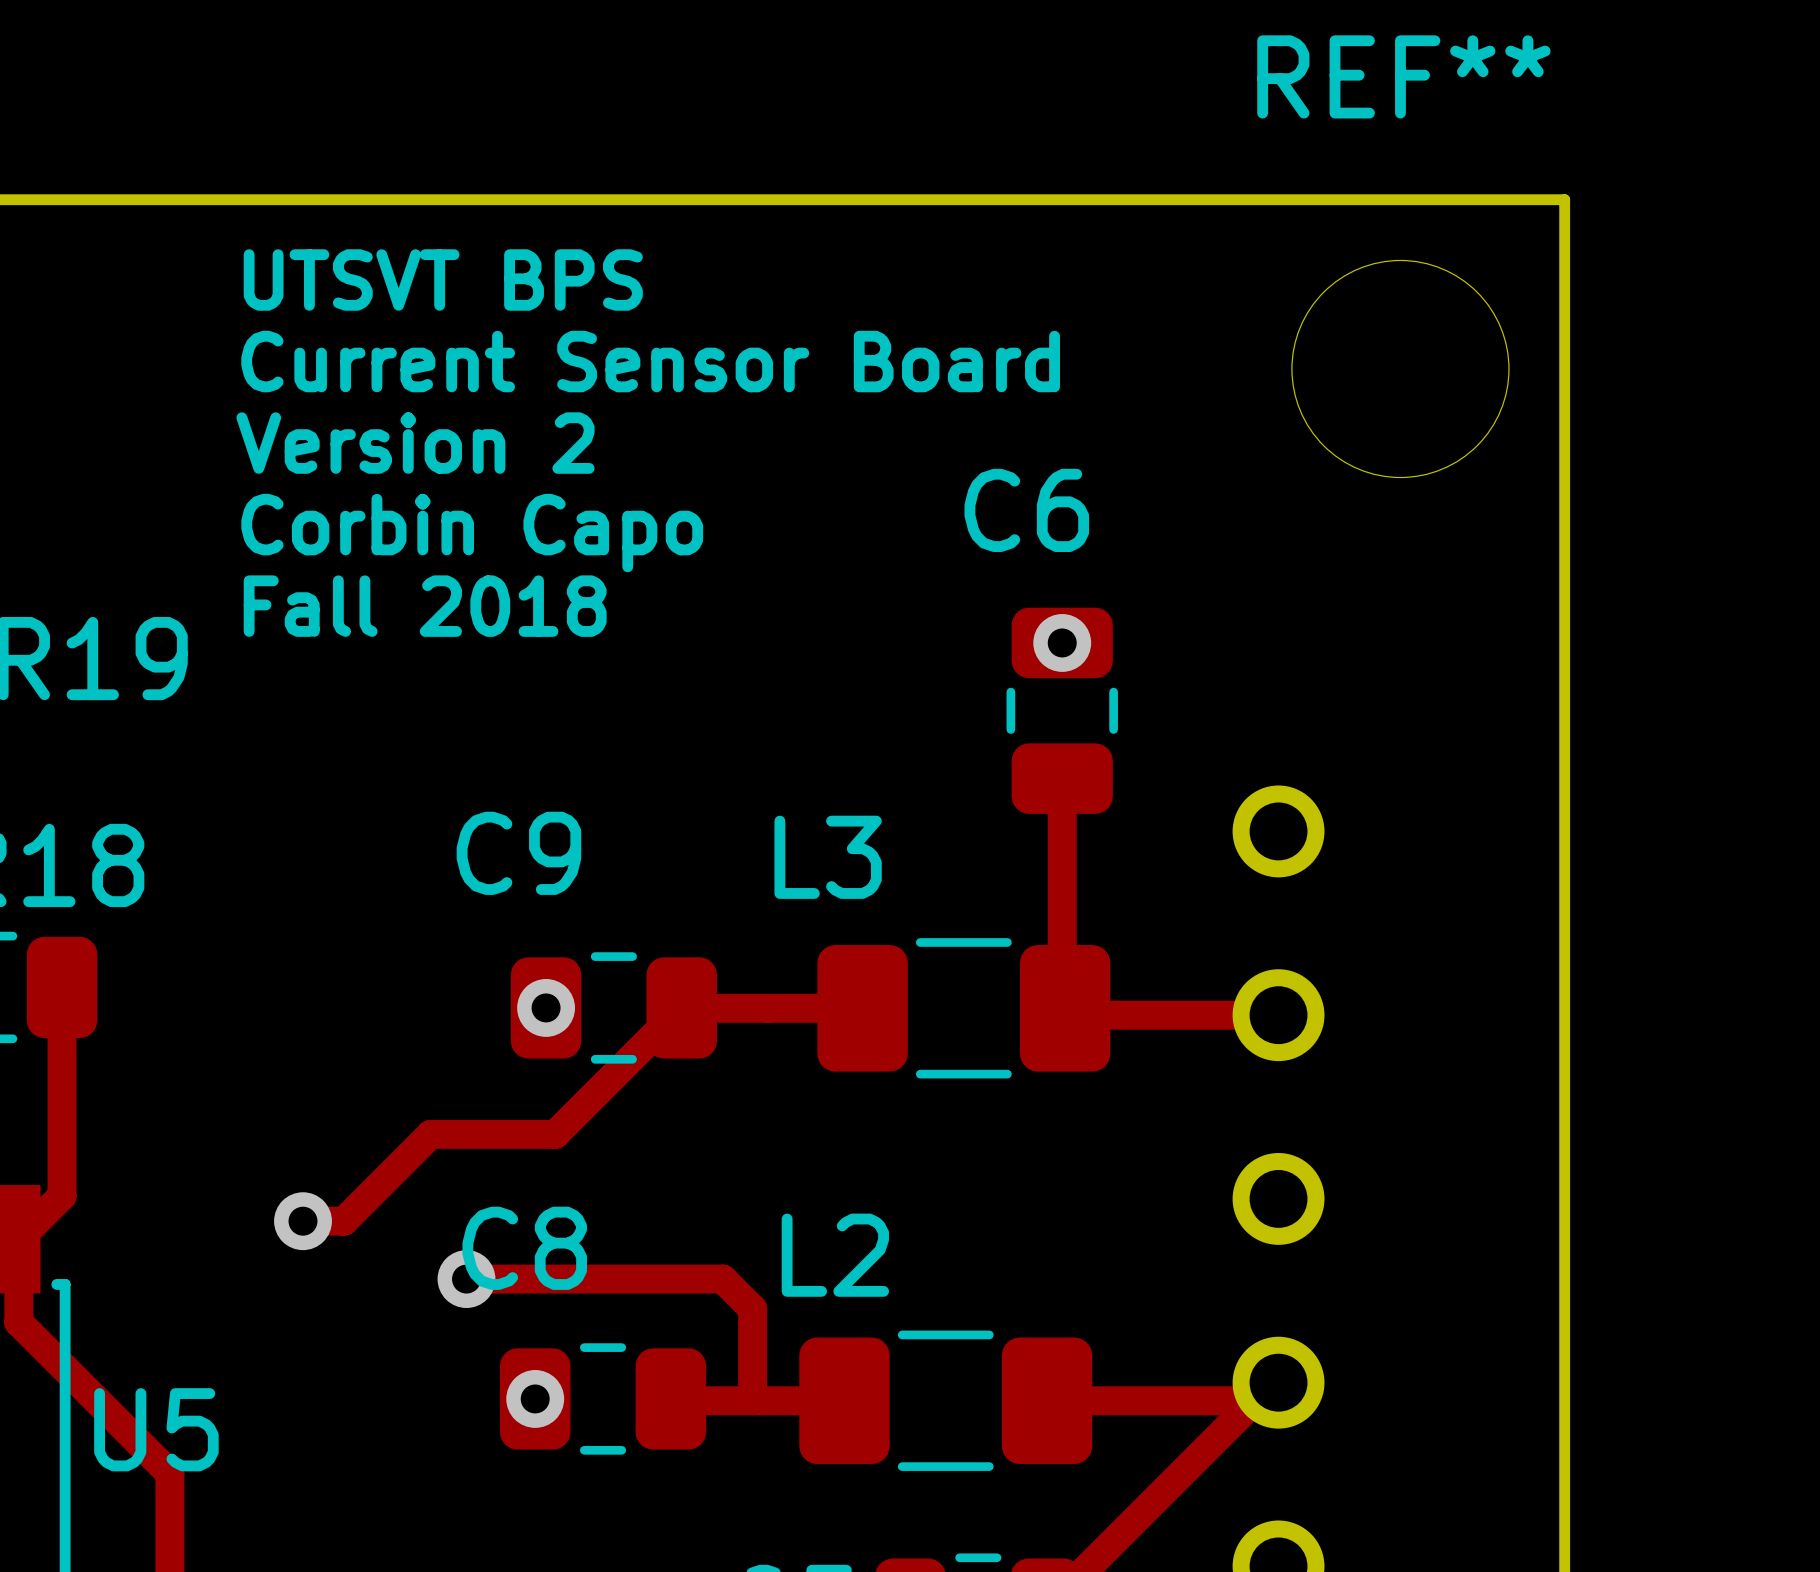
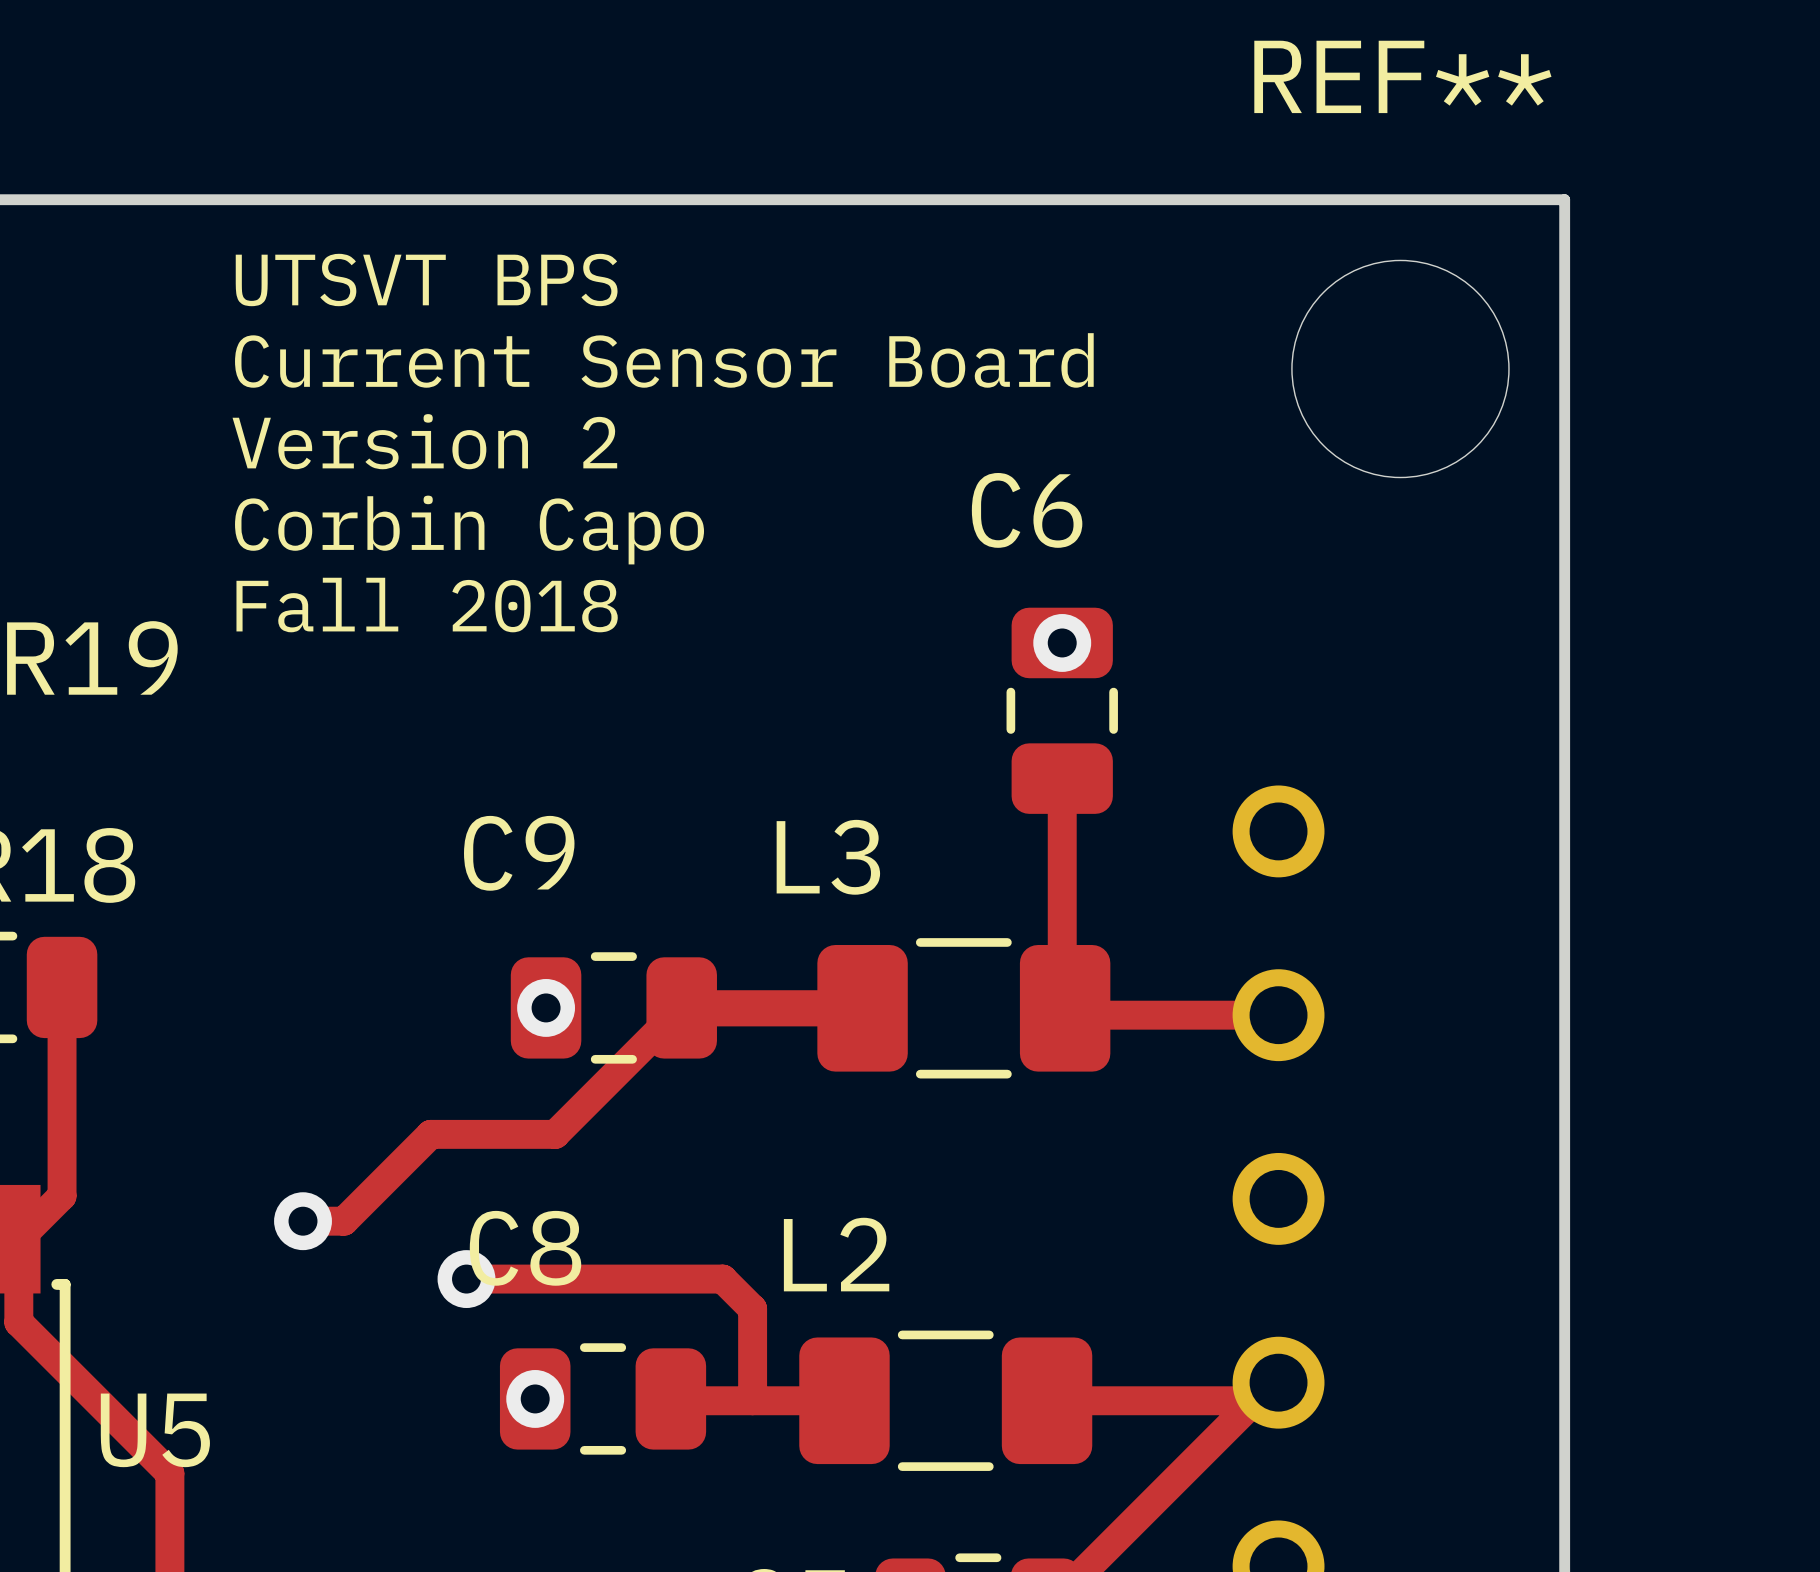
track width: thin (682, 1008) (862, 1008) -> thick (682, 1008) (862, 1008)

